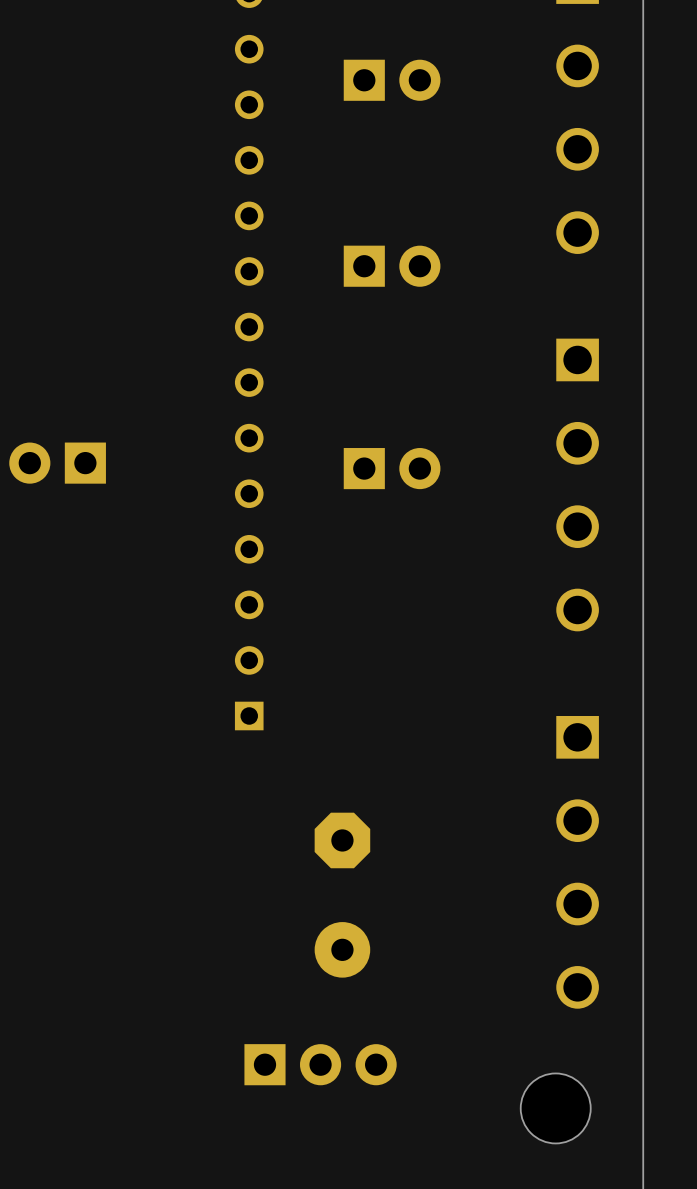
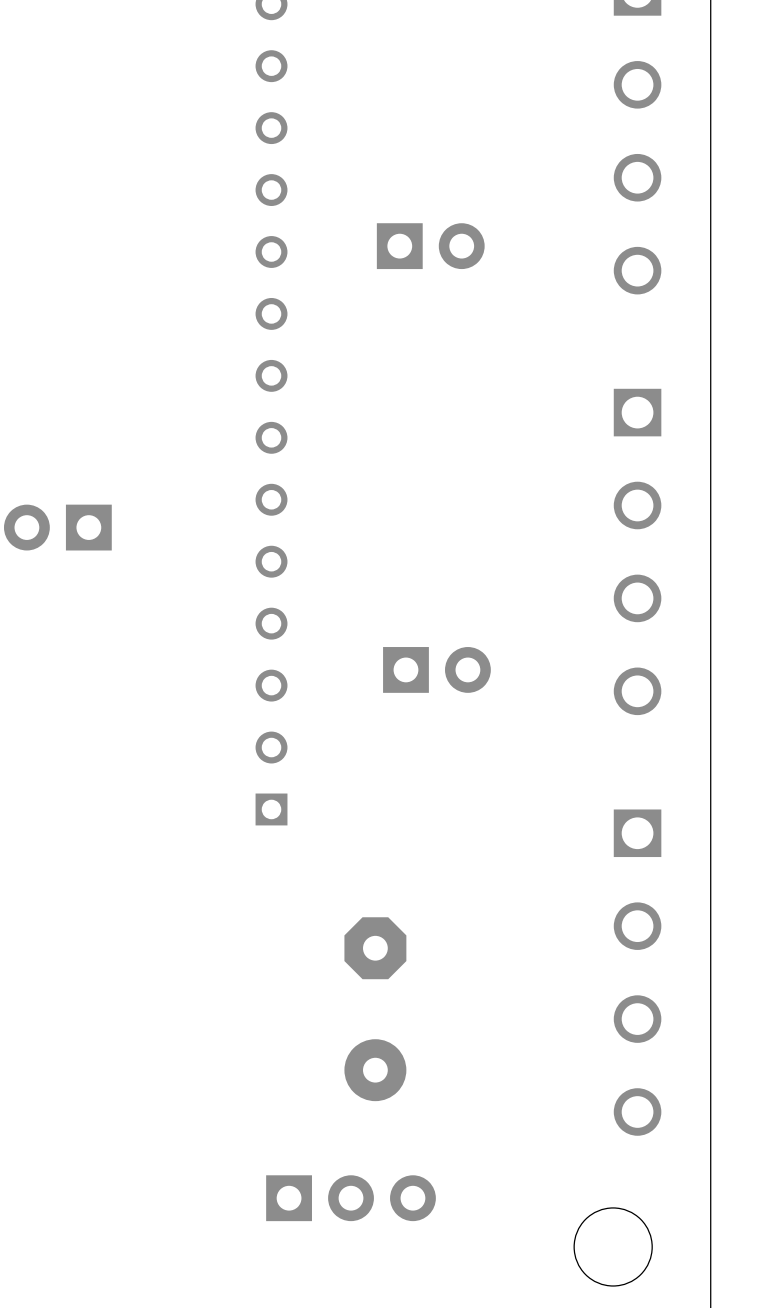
part: (392, 80) -> none
part position: (392, 266) -> (430, 246)
part position: (392, 468) -> (436, 669)

